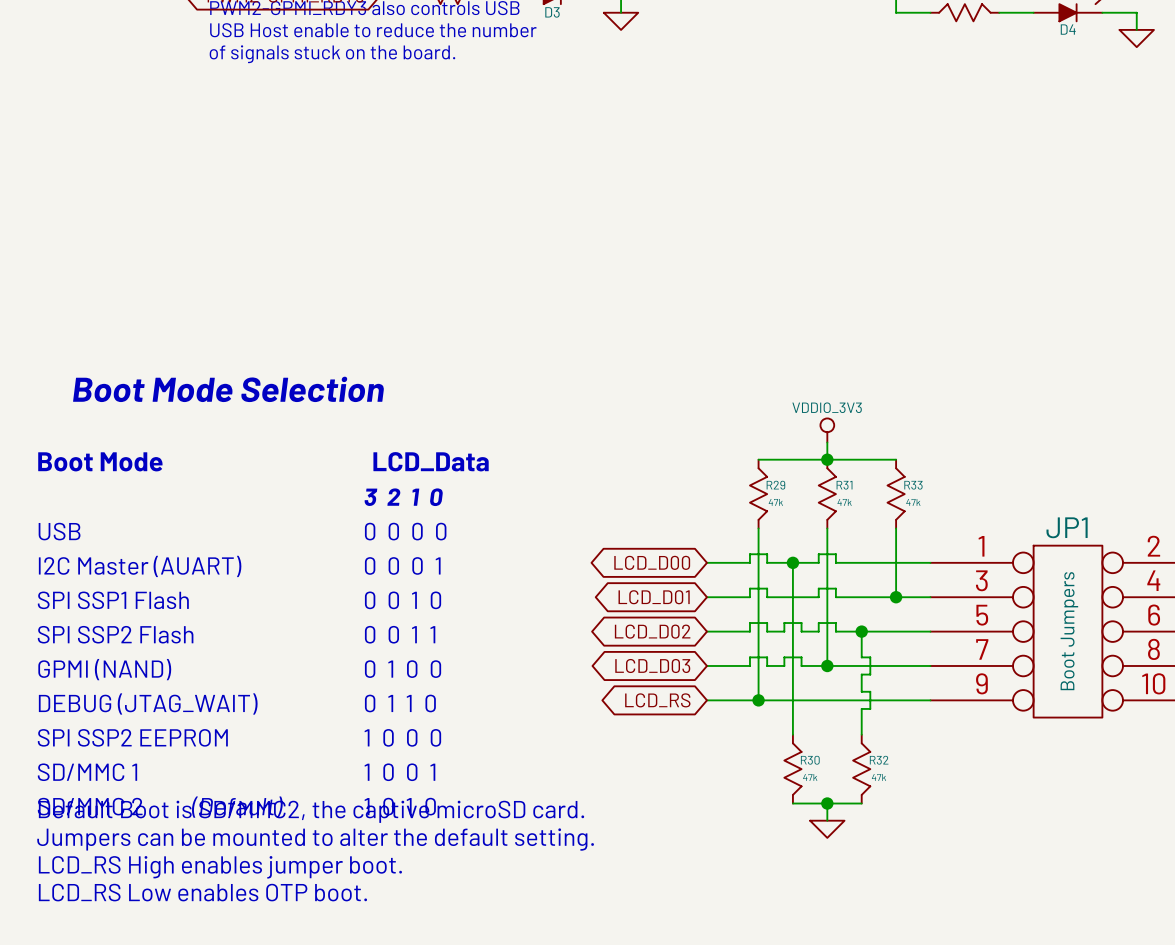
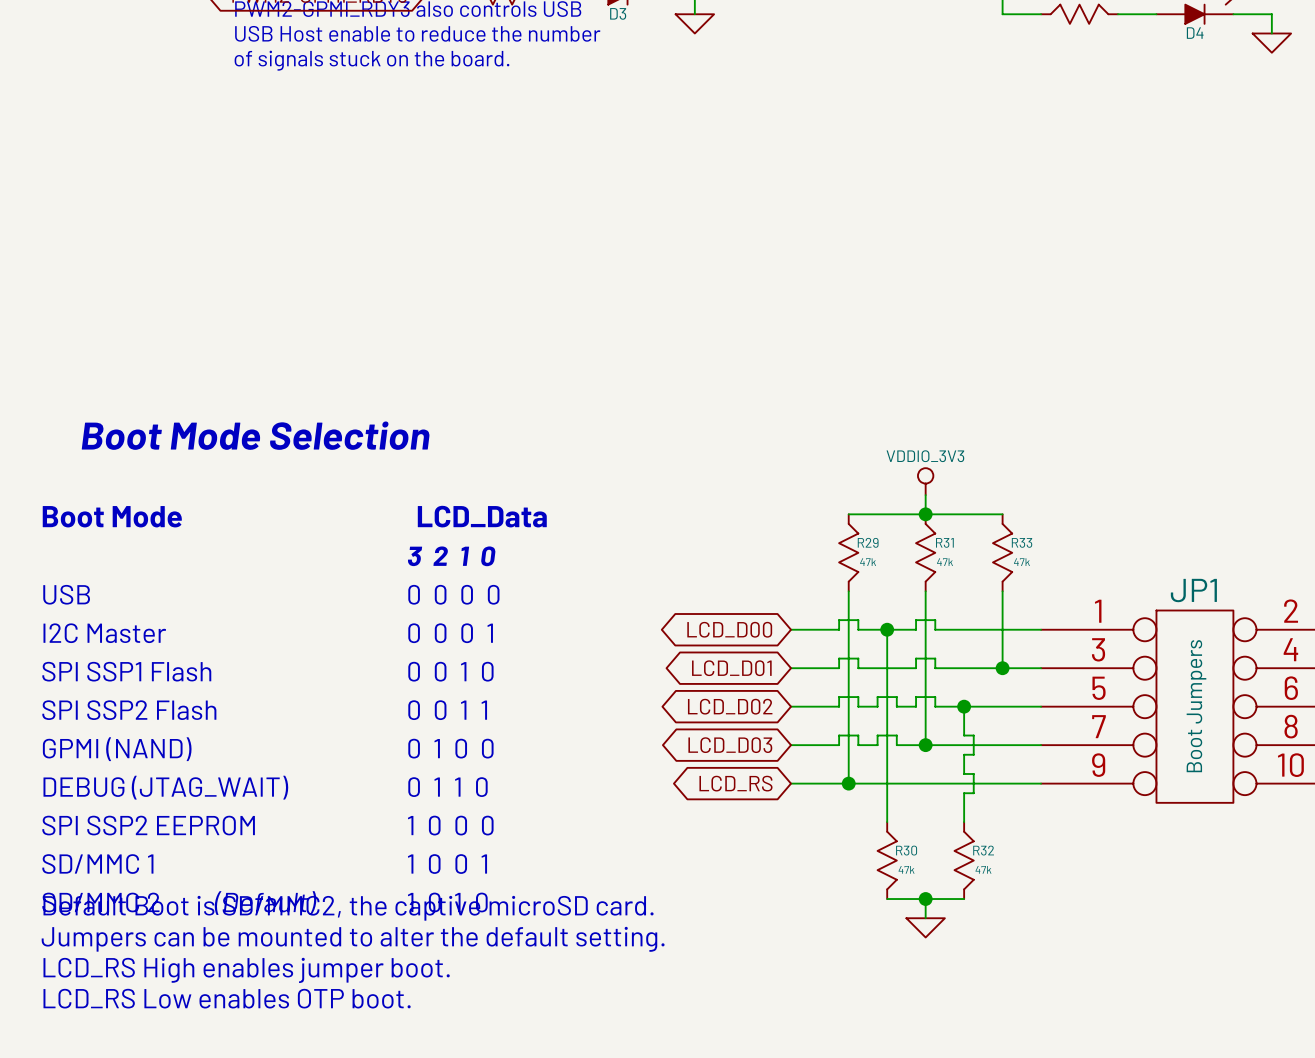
text: I2C Master (AUART) (140, 566) -> I2C Master (104, 633)

